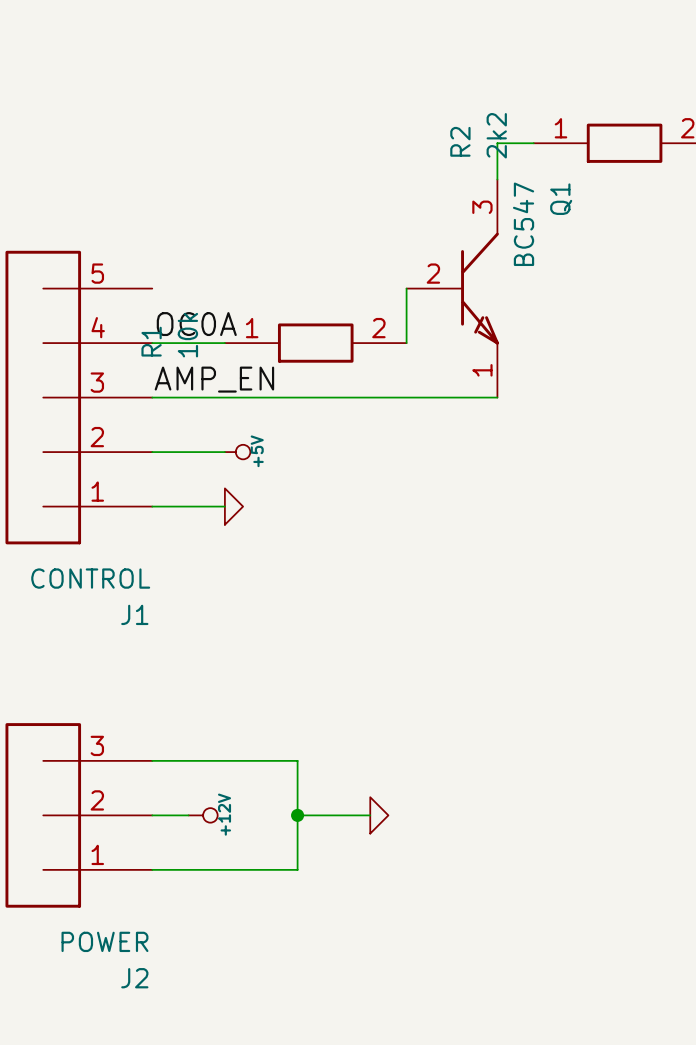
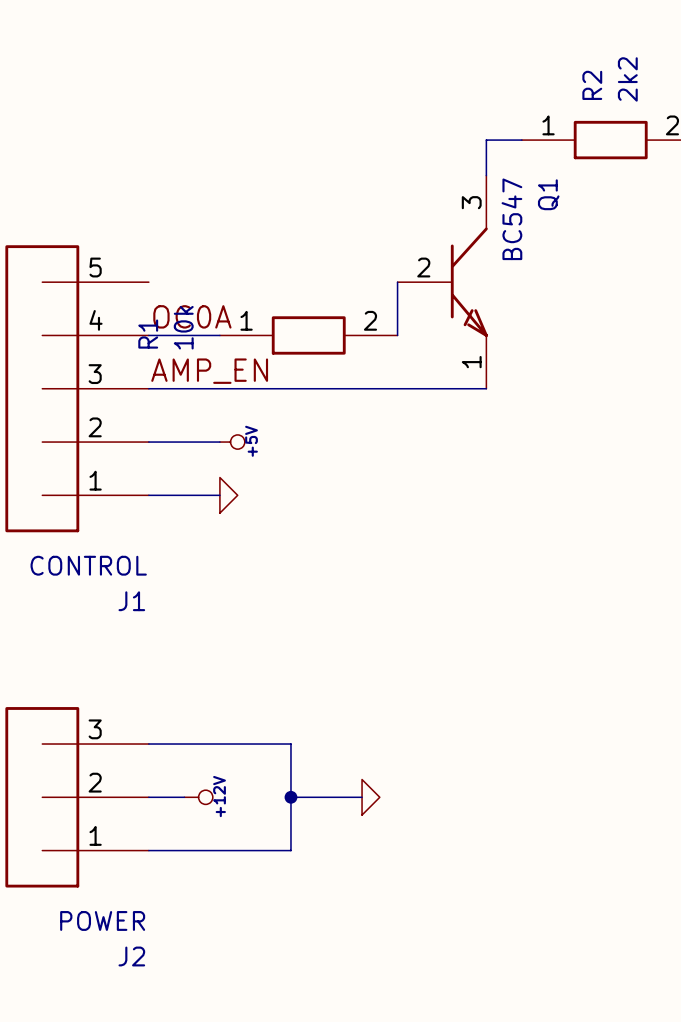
R2 value position: 2k2 (496, 135) -> 2k2 (627, 79)
R2 name position: R2 (460, 141) -> R2 (592, 85)

